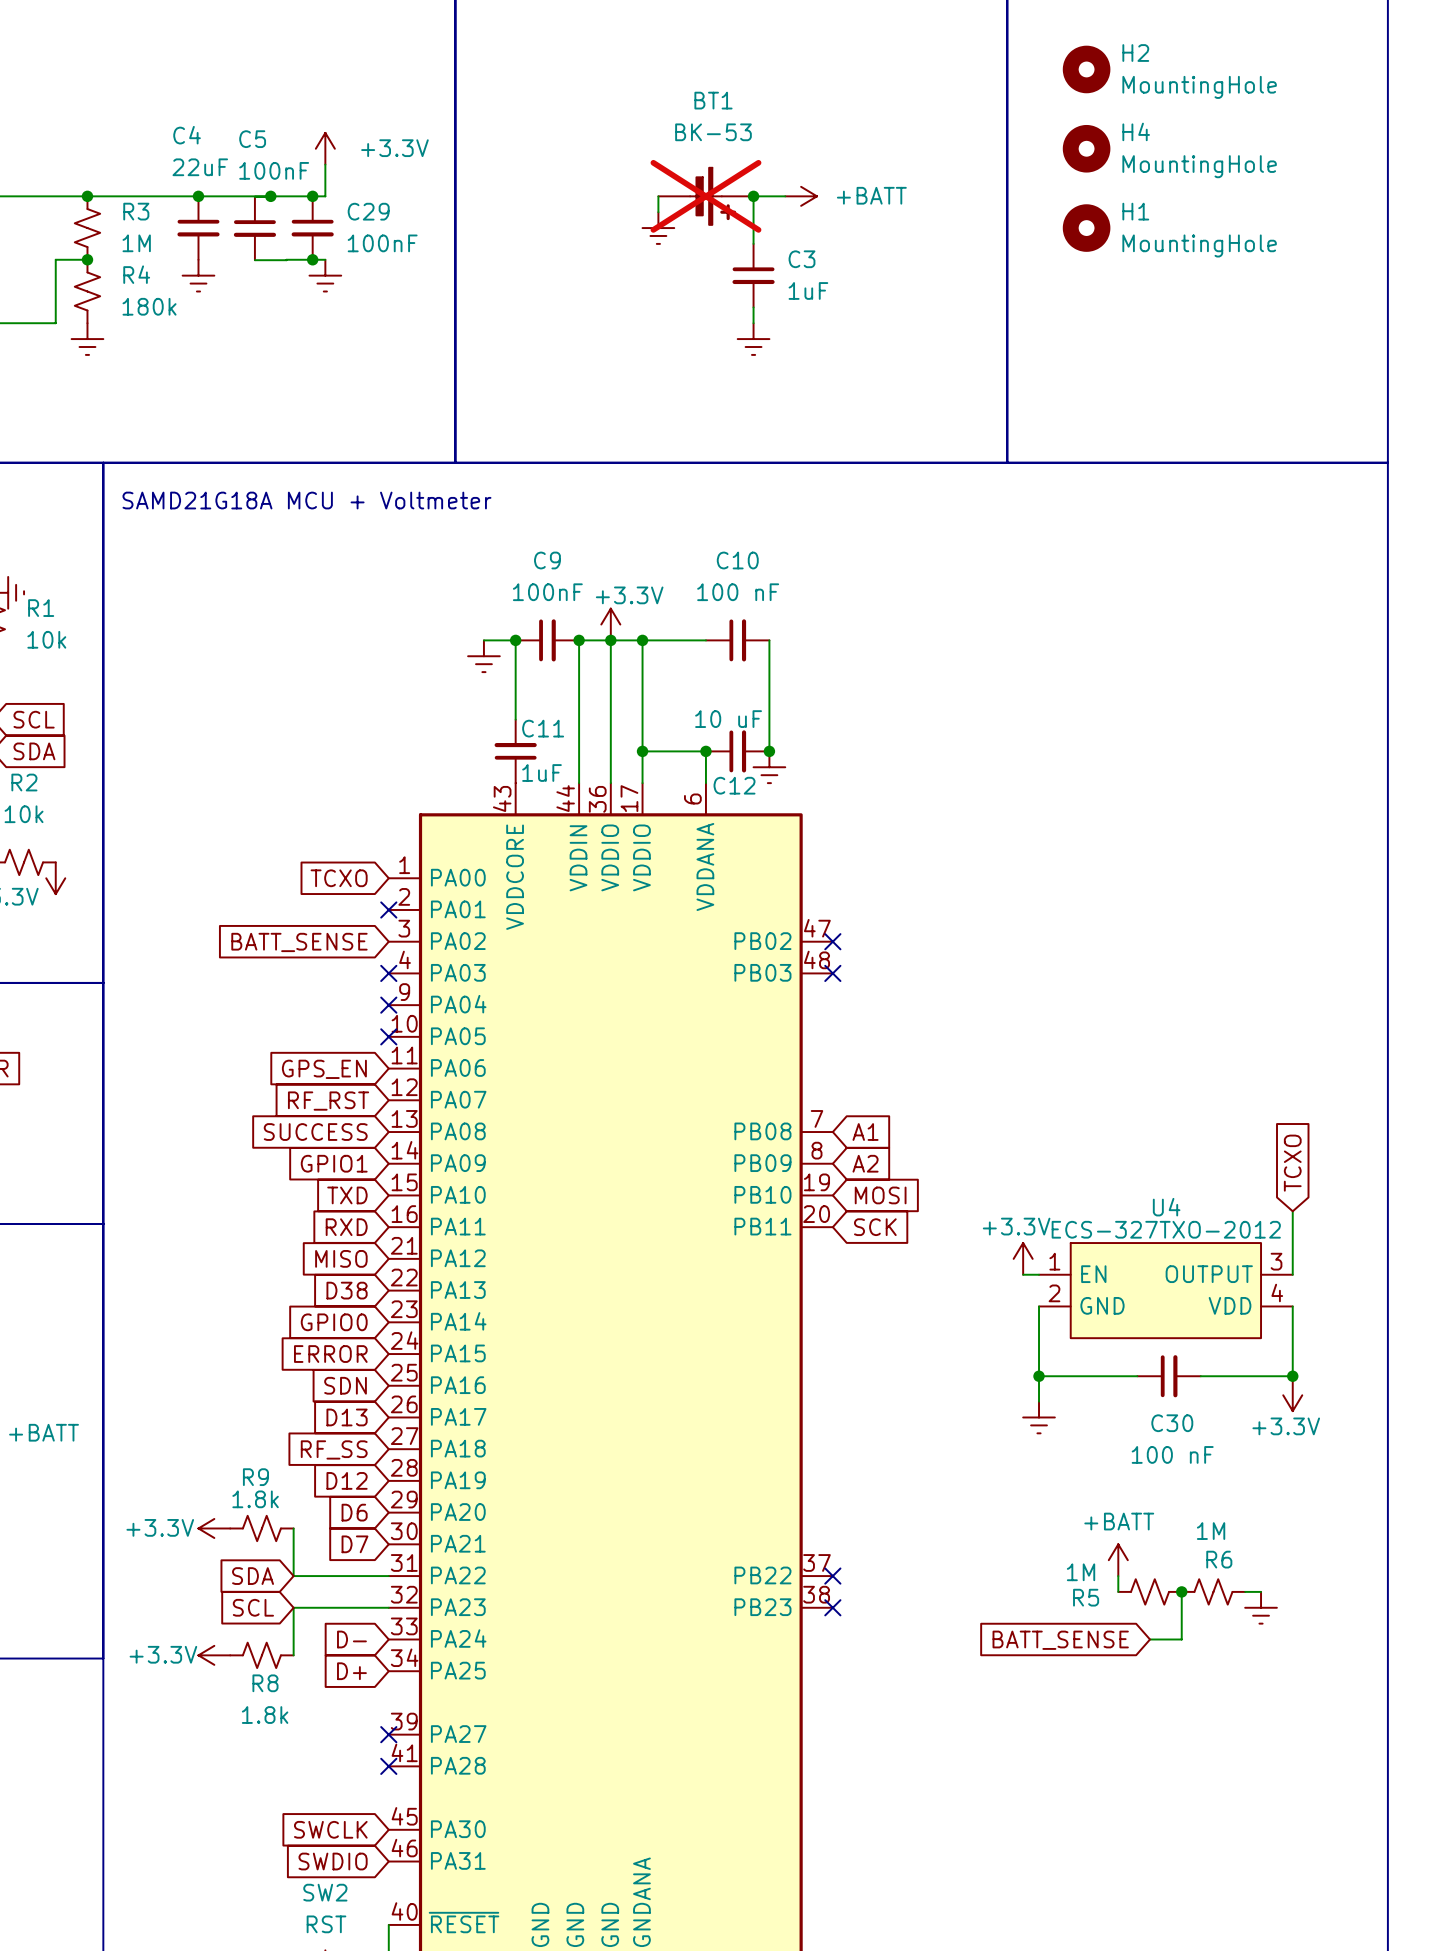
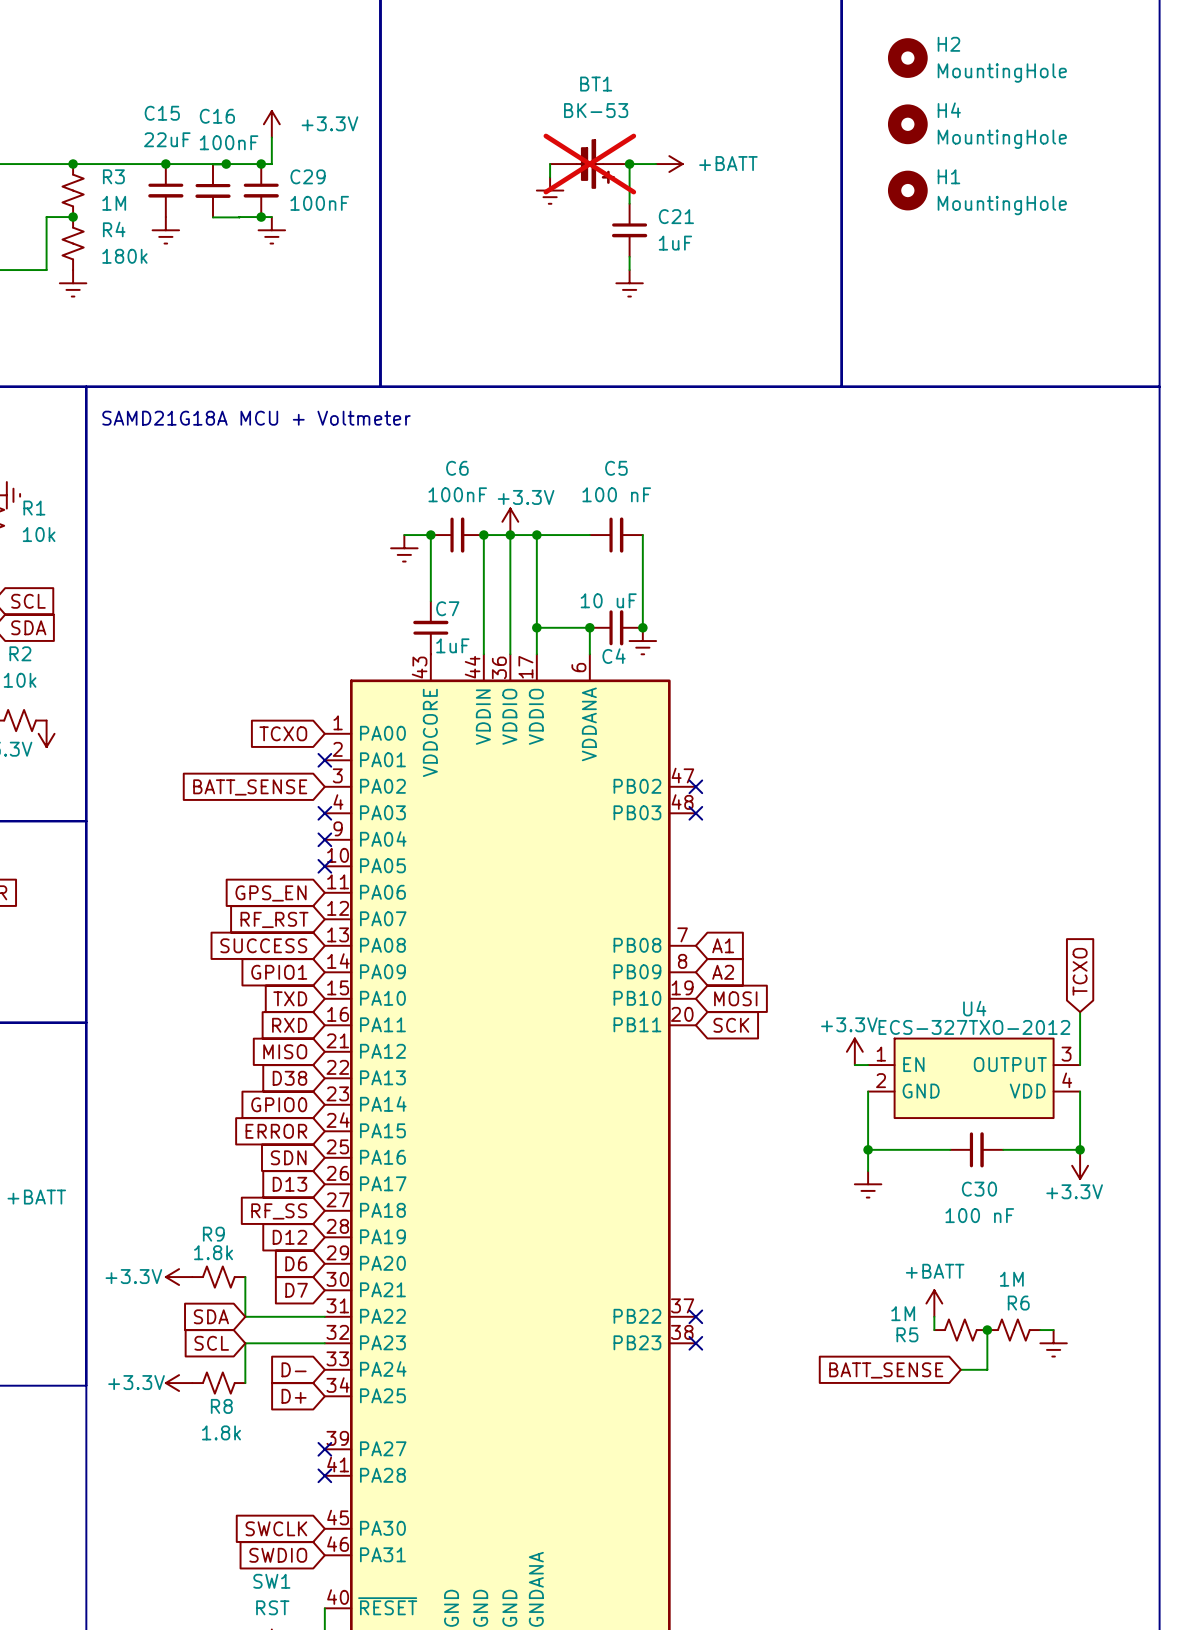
C4 name: C4 (187, 135) -> C15 (162, 113)
C5 name: C5 (252, 139) -> C16 (217, 116)
C3 name: C3 (802, 259) -> C21 (676, 216)
C9 name: C9 (547, 560) -> C6 (457, 468)
C10 name: C10 (737, 560) -> C5 (616, 468)
C11 name: C11 (543, 728) -> C7 (447, 608)
C12 name: C12 (734, 785) -> C4 (614, 656)
SW2 name: SW2 (325, 1892) -> SW1 (271, 1581)

